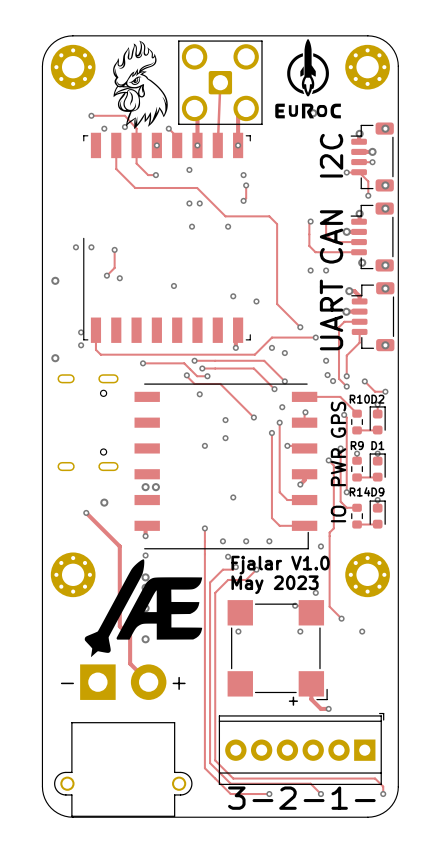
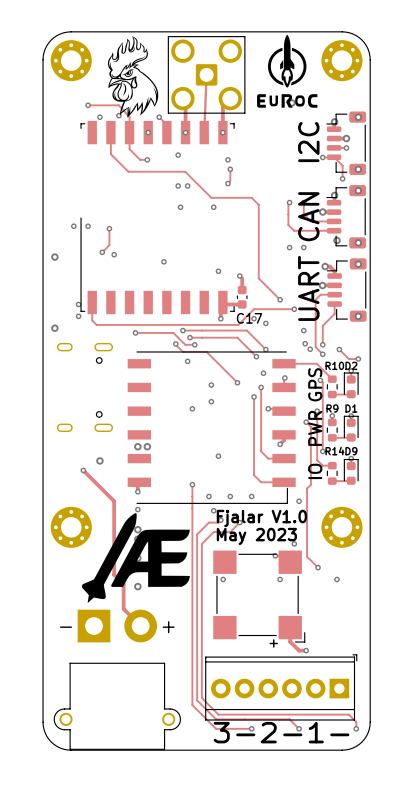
track: none -> (242, 278) (242, 290)
C17: none -> (242, 297)
track: none -> (222, 302) (224, 304) (242, 304)

